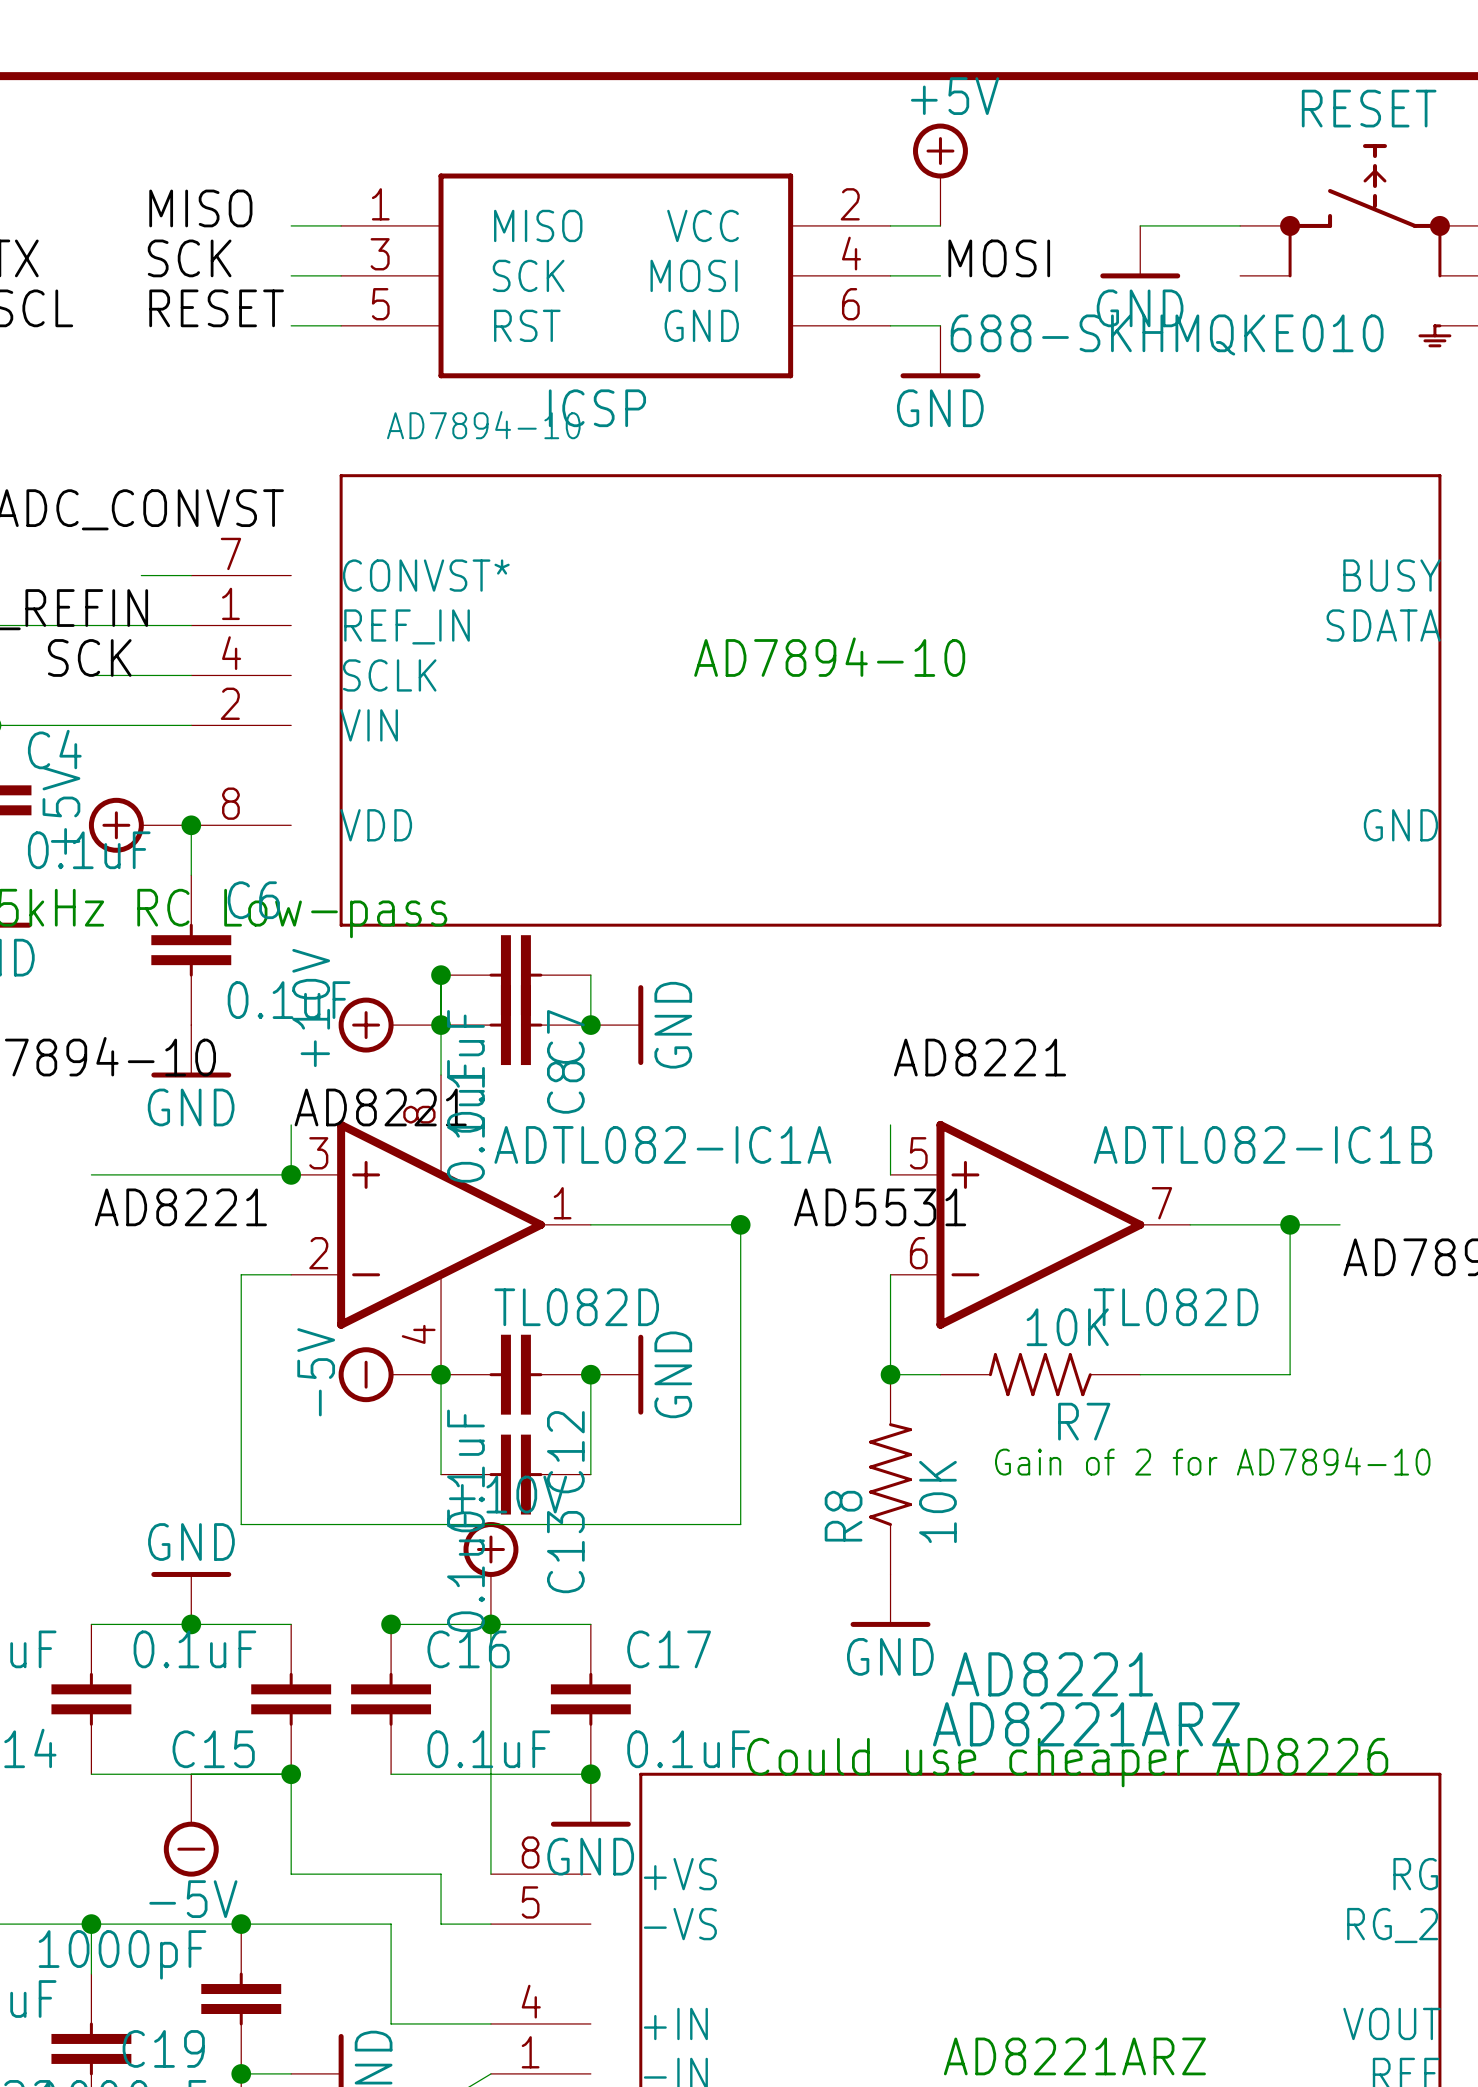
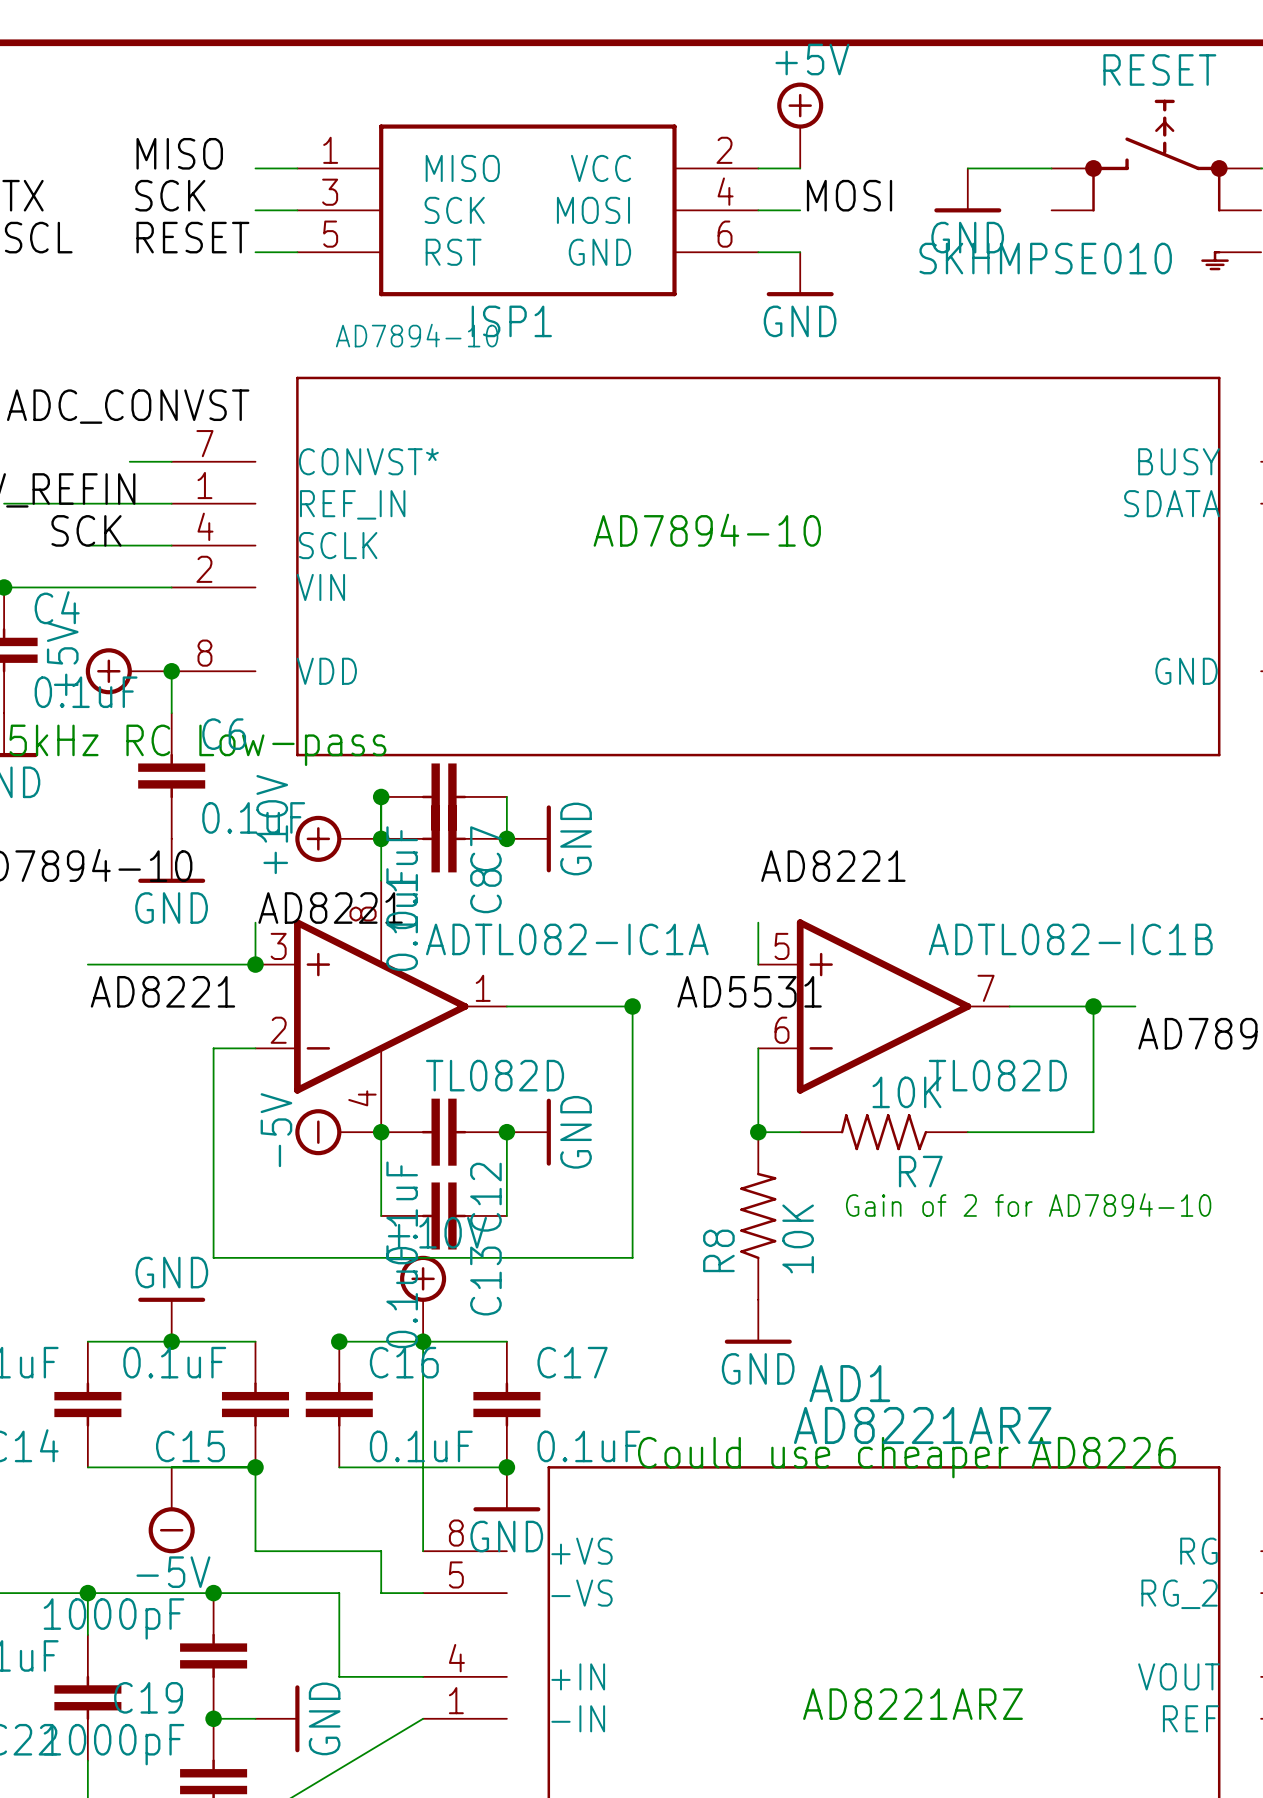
RESET value: 688-SKHMQKE010 (1167, 335) -> SKHMPSE010 (1045, 258)
ICSP name: ICSP (597, 408) -> ISP1 (511, 321)
AD8221 name: AD8221 (1052, 1674) -> AD1 (849, 1383)

